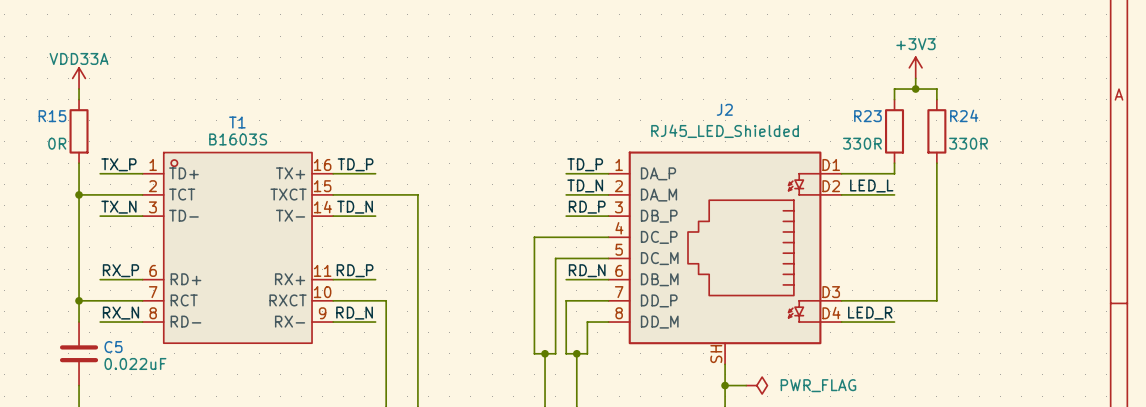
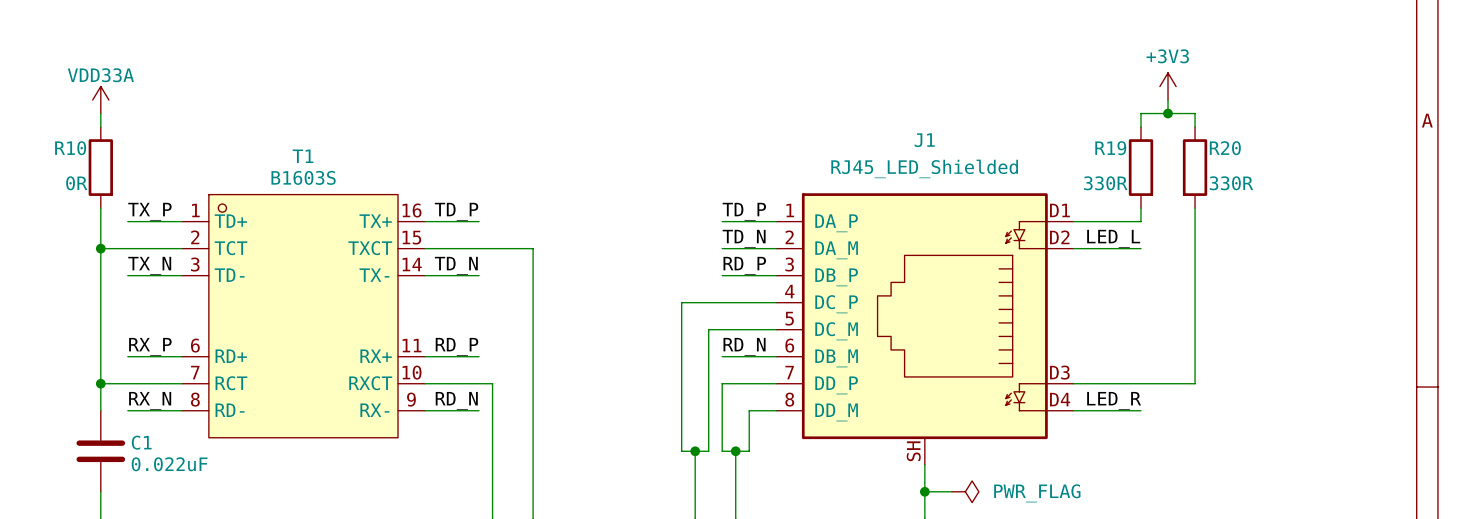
J2 name: J2 (724, 109) -> J1 (924, 140)
R24 name: R24 (964, 115) -> R20 (1225, 148)
R15 name: R15 (52, 116) -> R10 (70, 148)
R23 name: R23 (867, 116) -> R19 (1110, 148)
C5 name: C5 (113, 347) -> C1 (141, 442)

